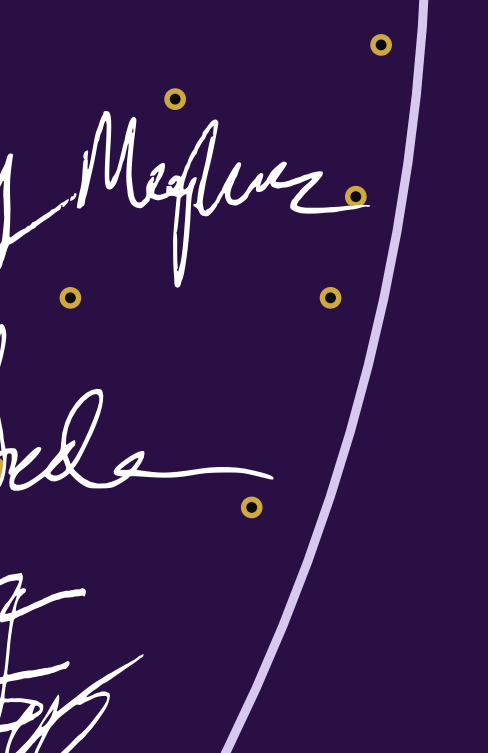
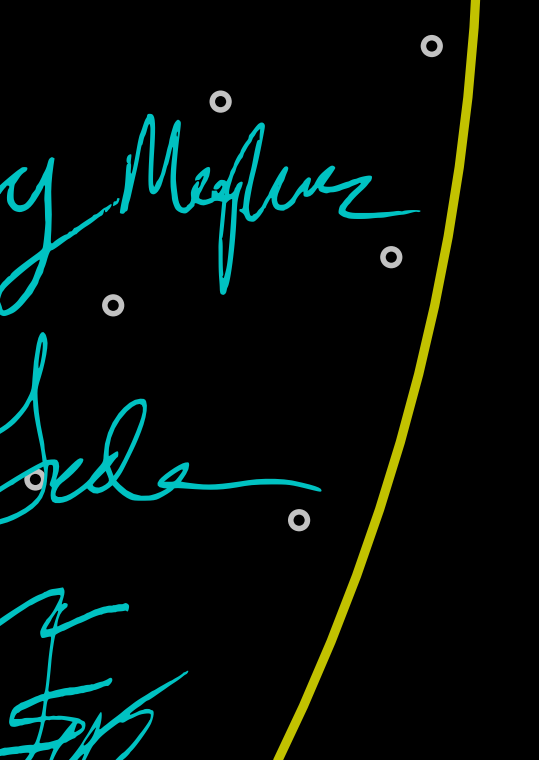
via: (355, 196) -> none
via: none -> (391, 257)
via: (330, 297) -> none

